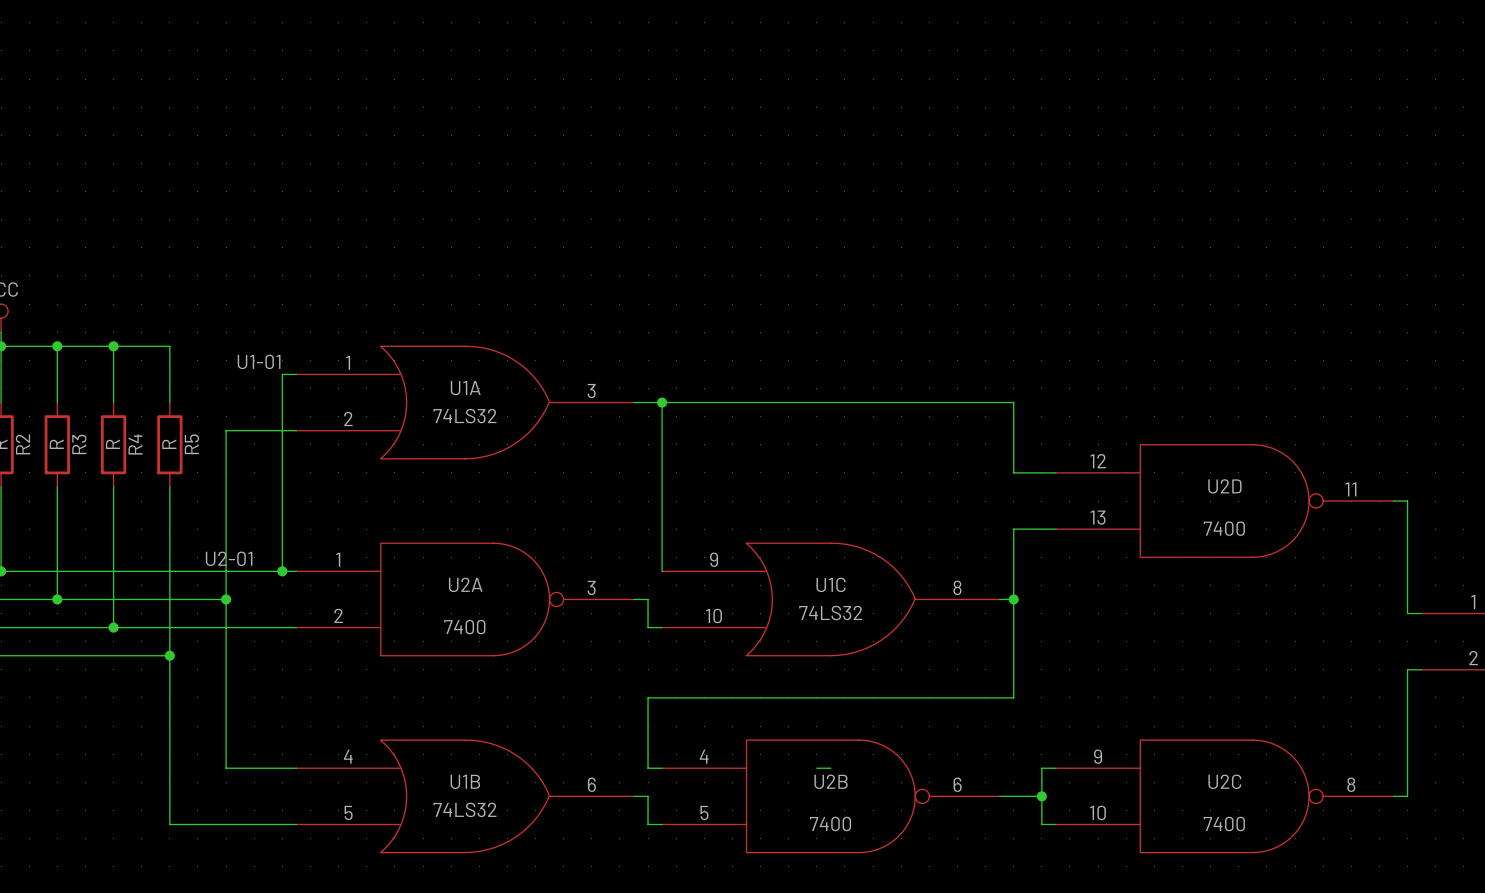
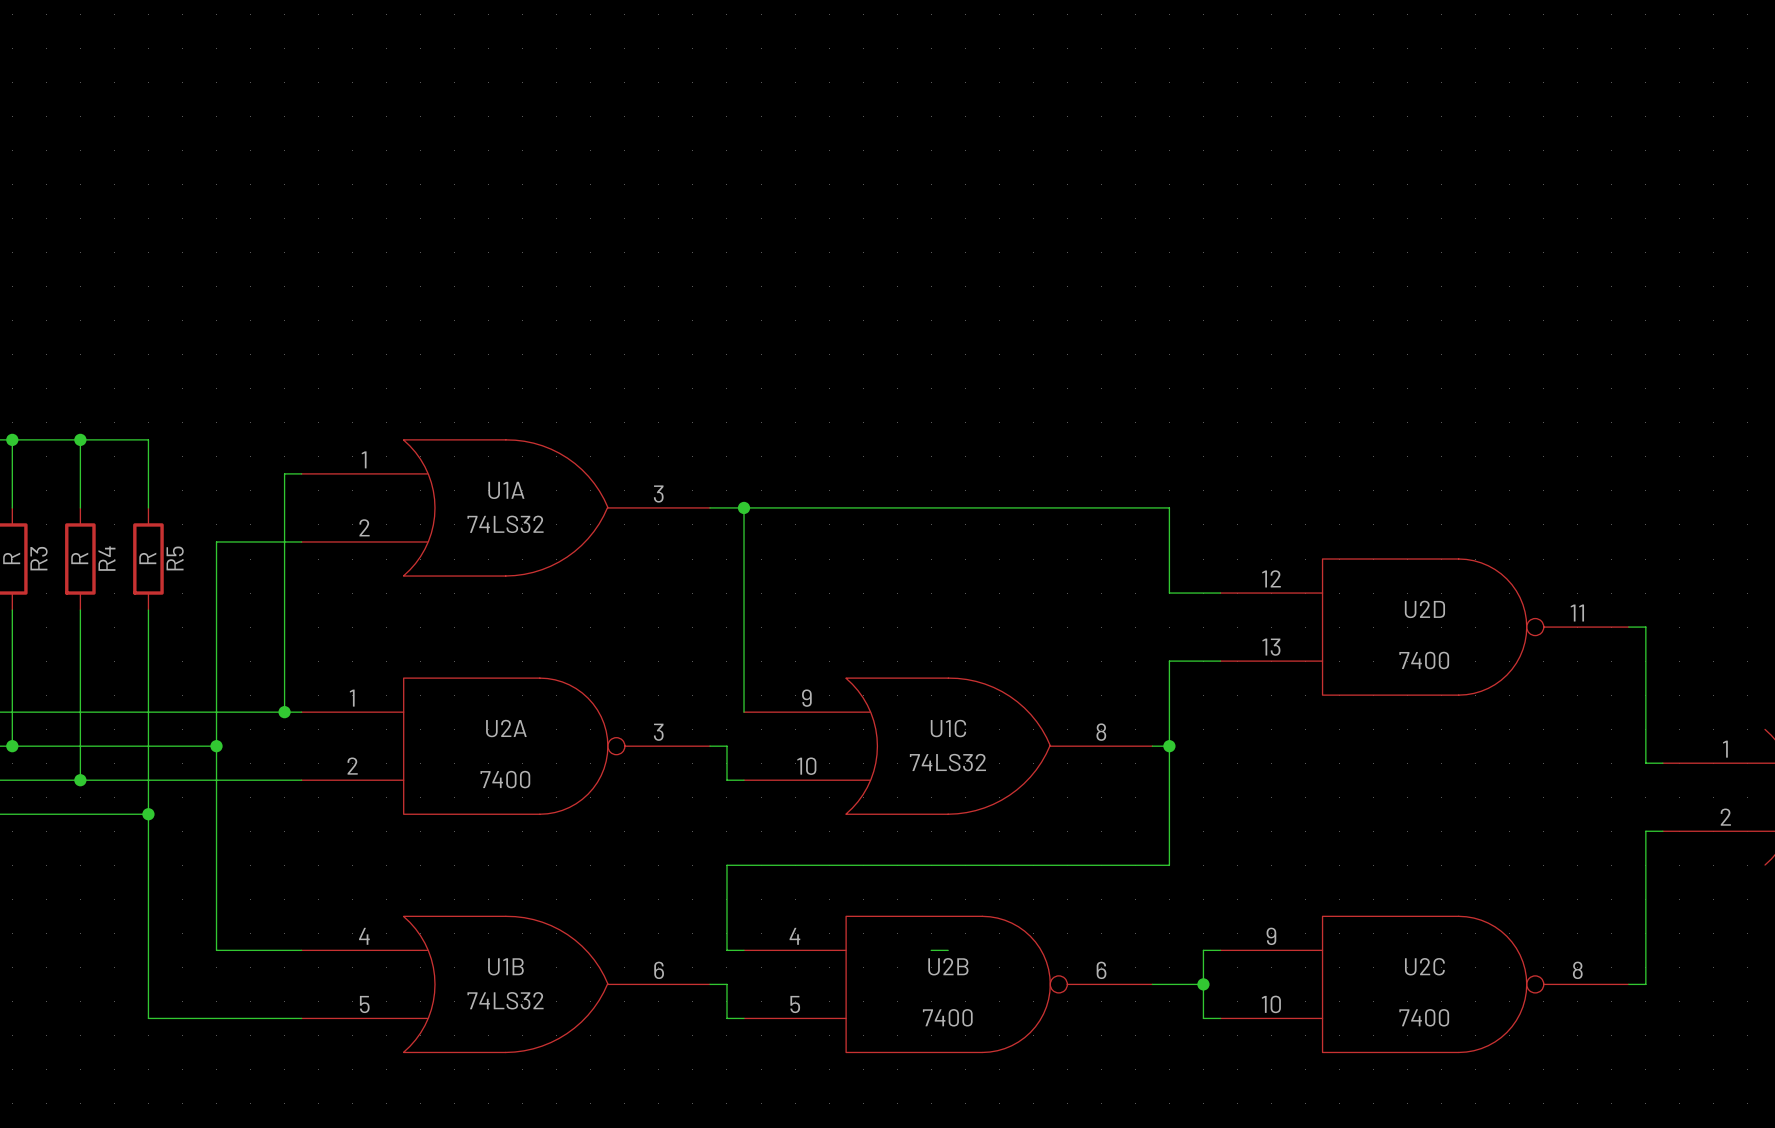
label: U1-01 (259, 361) -> none
label: U2-01 (229, 558) -> none

